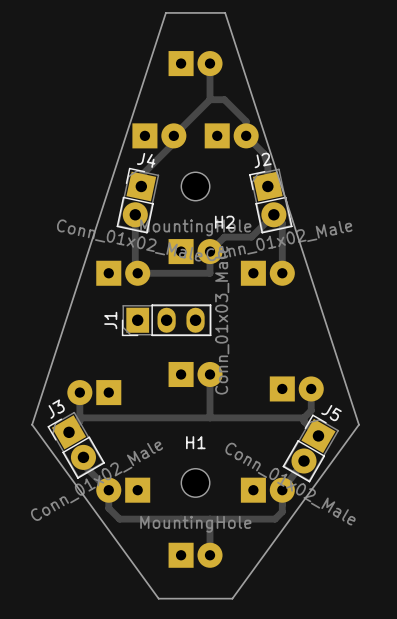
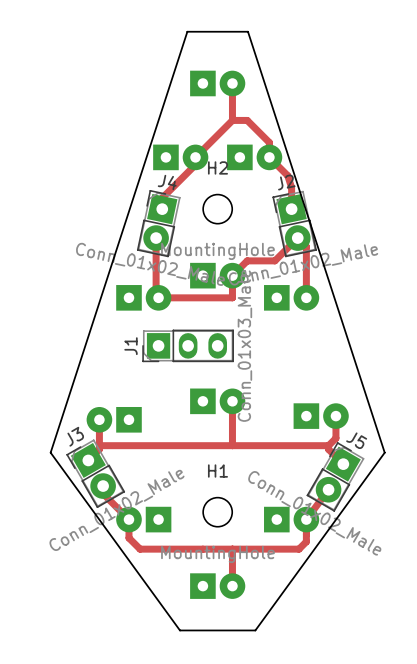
H2 name position: H2 (224, 222) -> H2 (217, 167)

